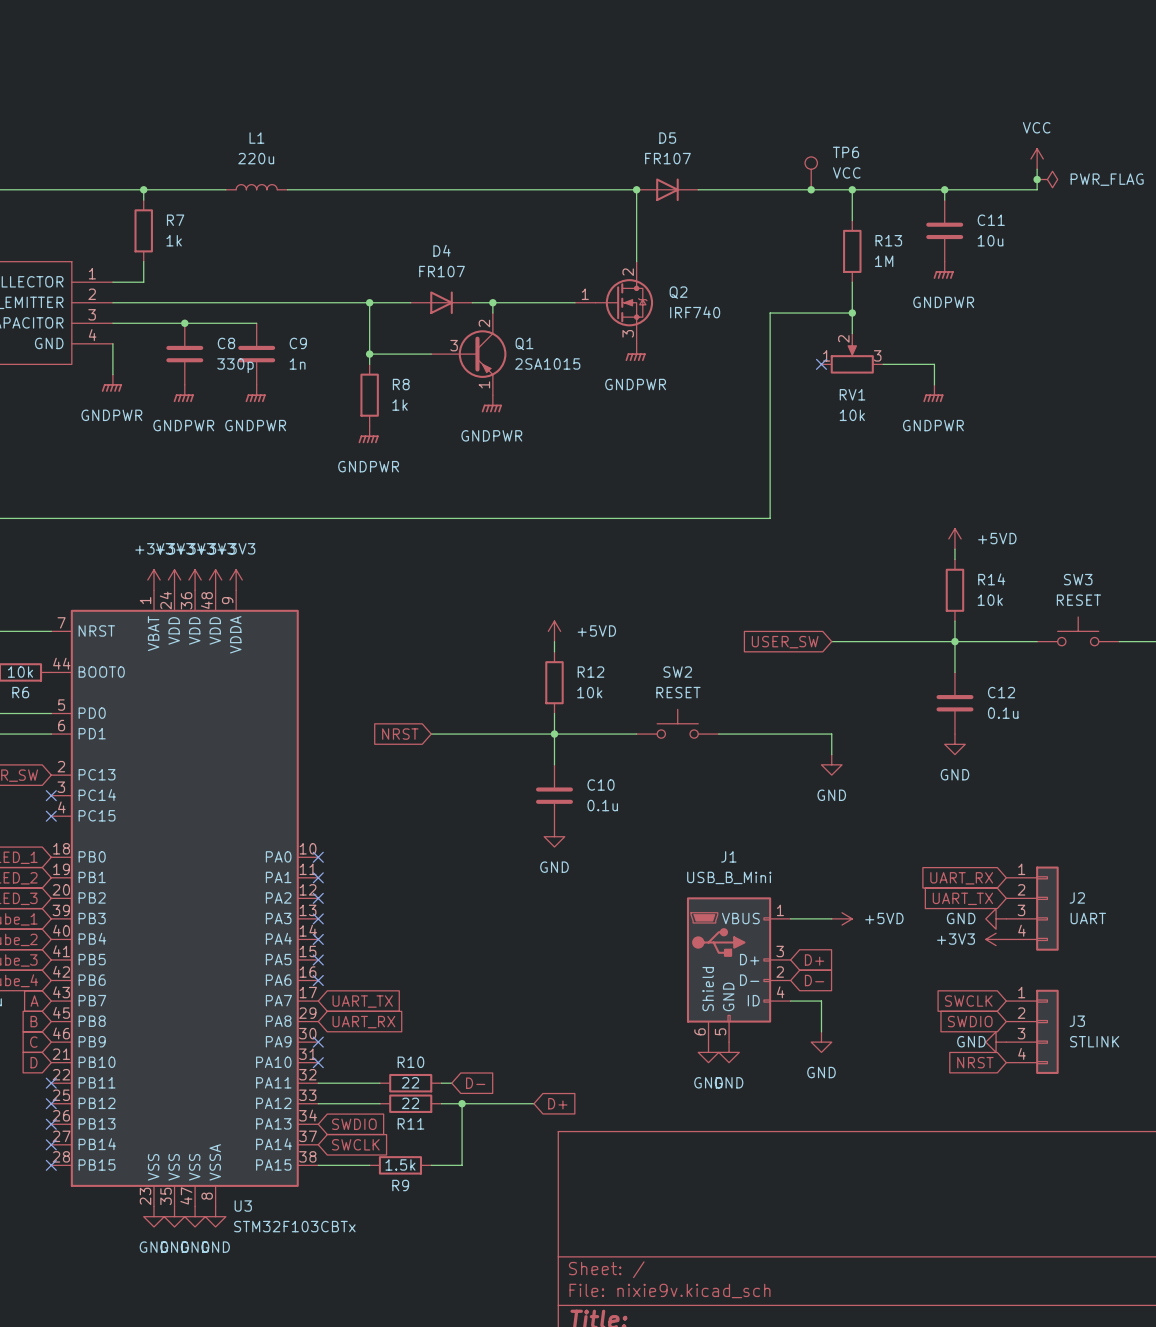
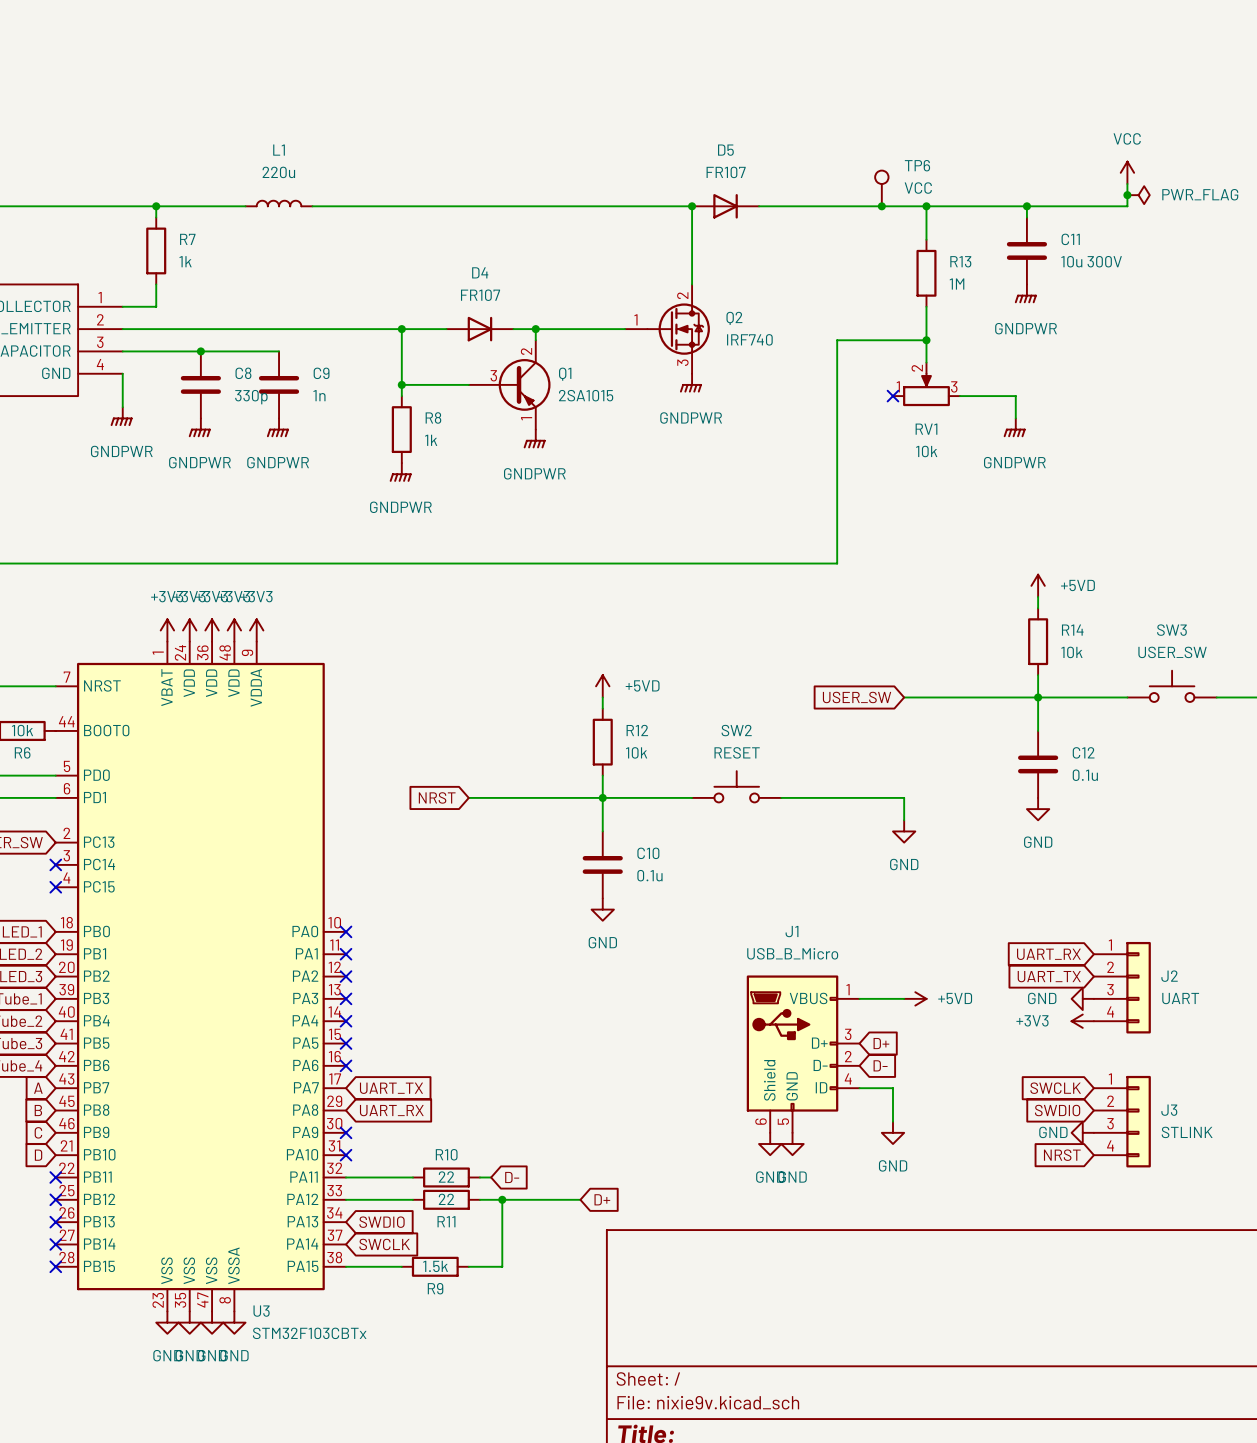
C11 value: 10u (990, 240) -> 10u 300V (1091, 261)
SW3 value: RESET (1078, 600) -> USER_SW (1172, 652)
J1 value: USB_B_Mini (729, 877) -> USB_B_Micro (792, 953)

